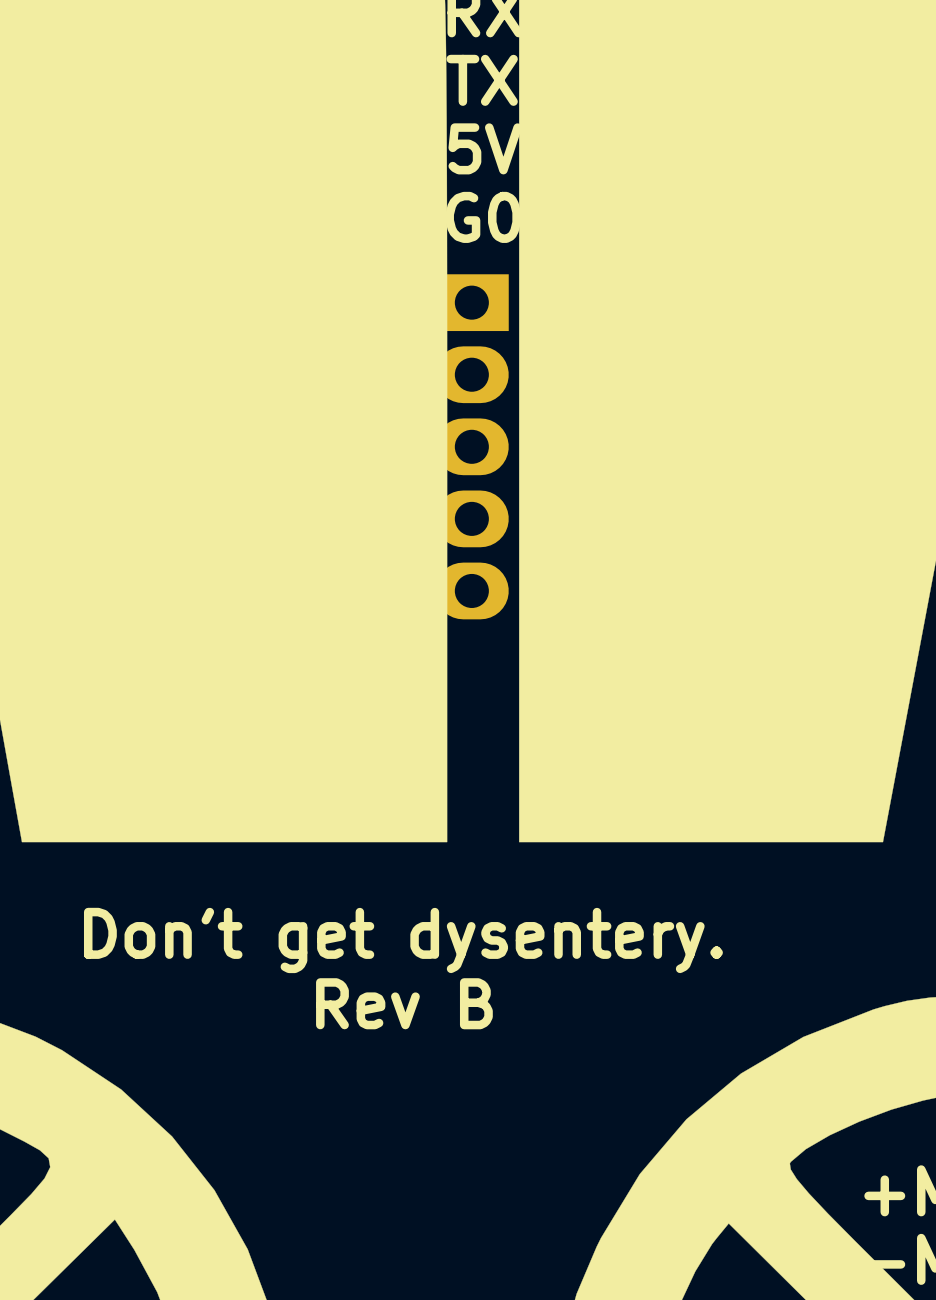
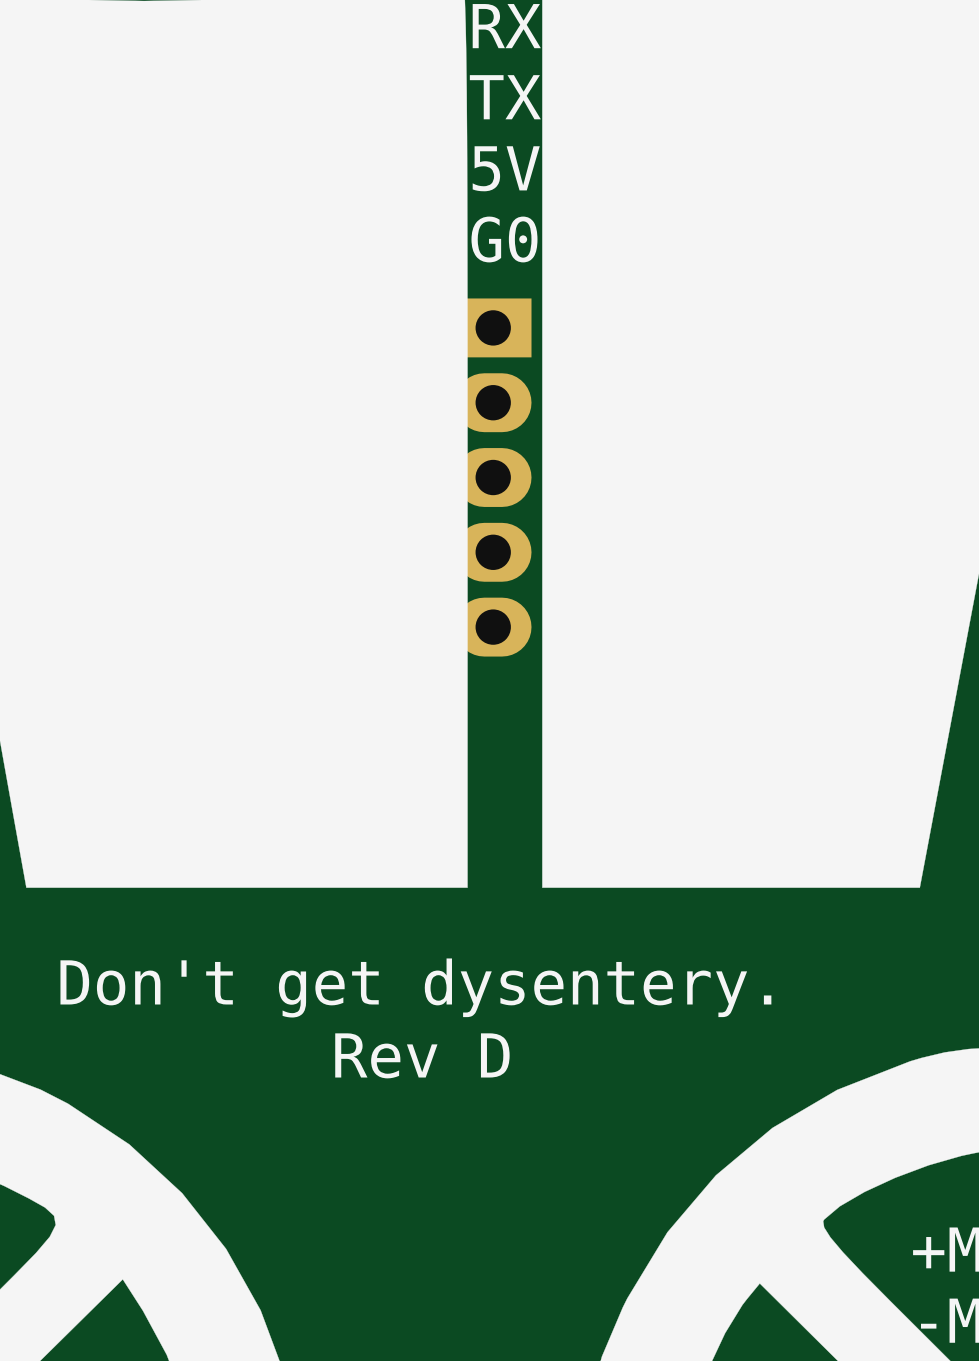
text: Rev B (404, 1003) -> Rev D (422, 1055)

